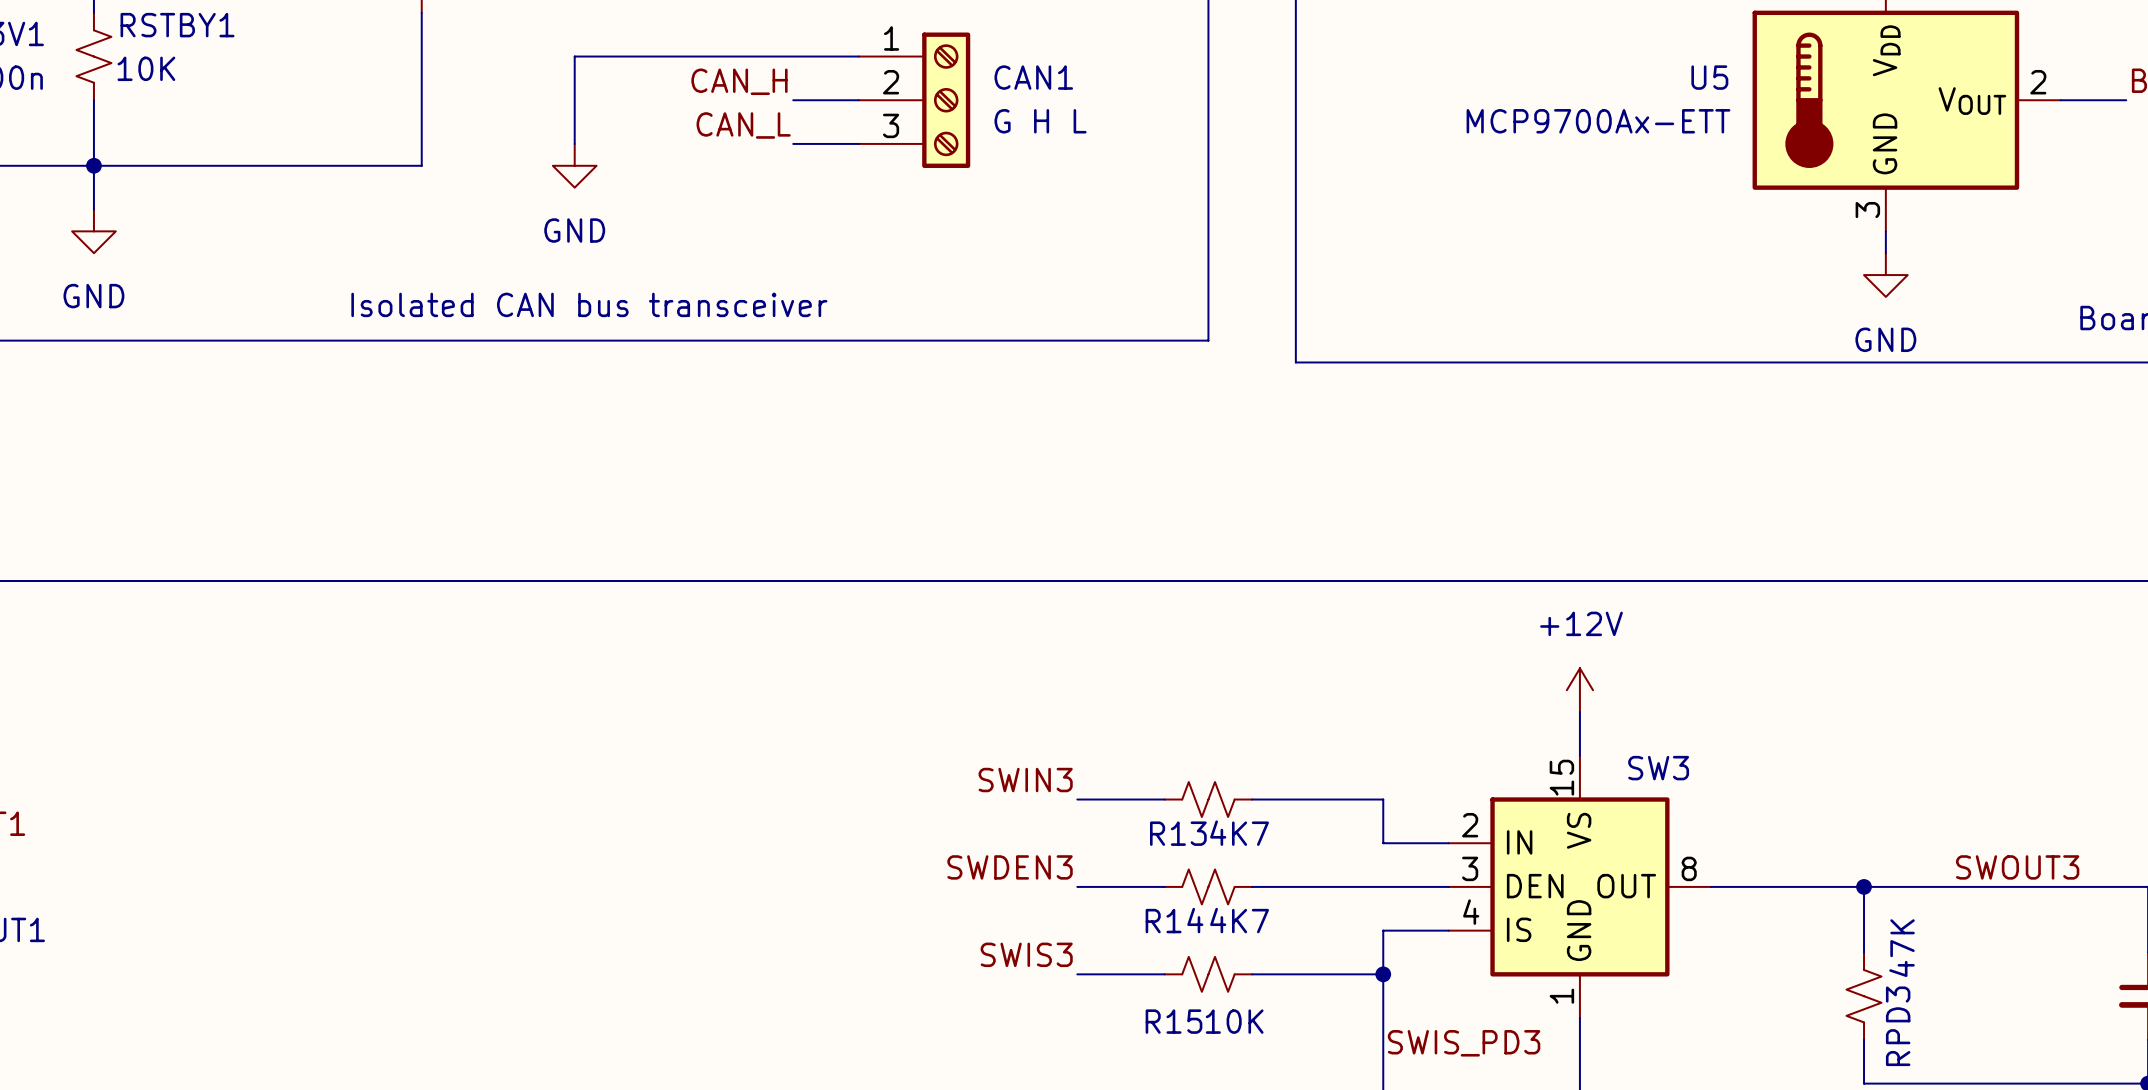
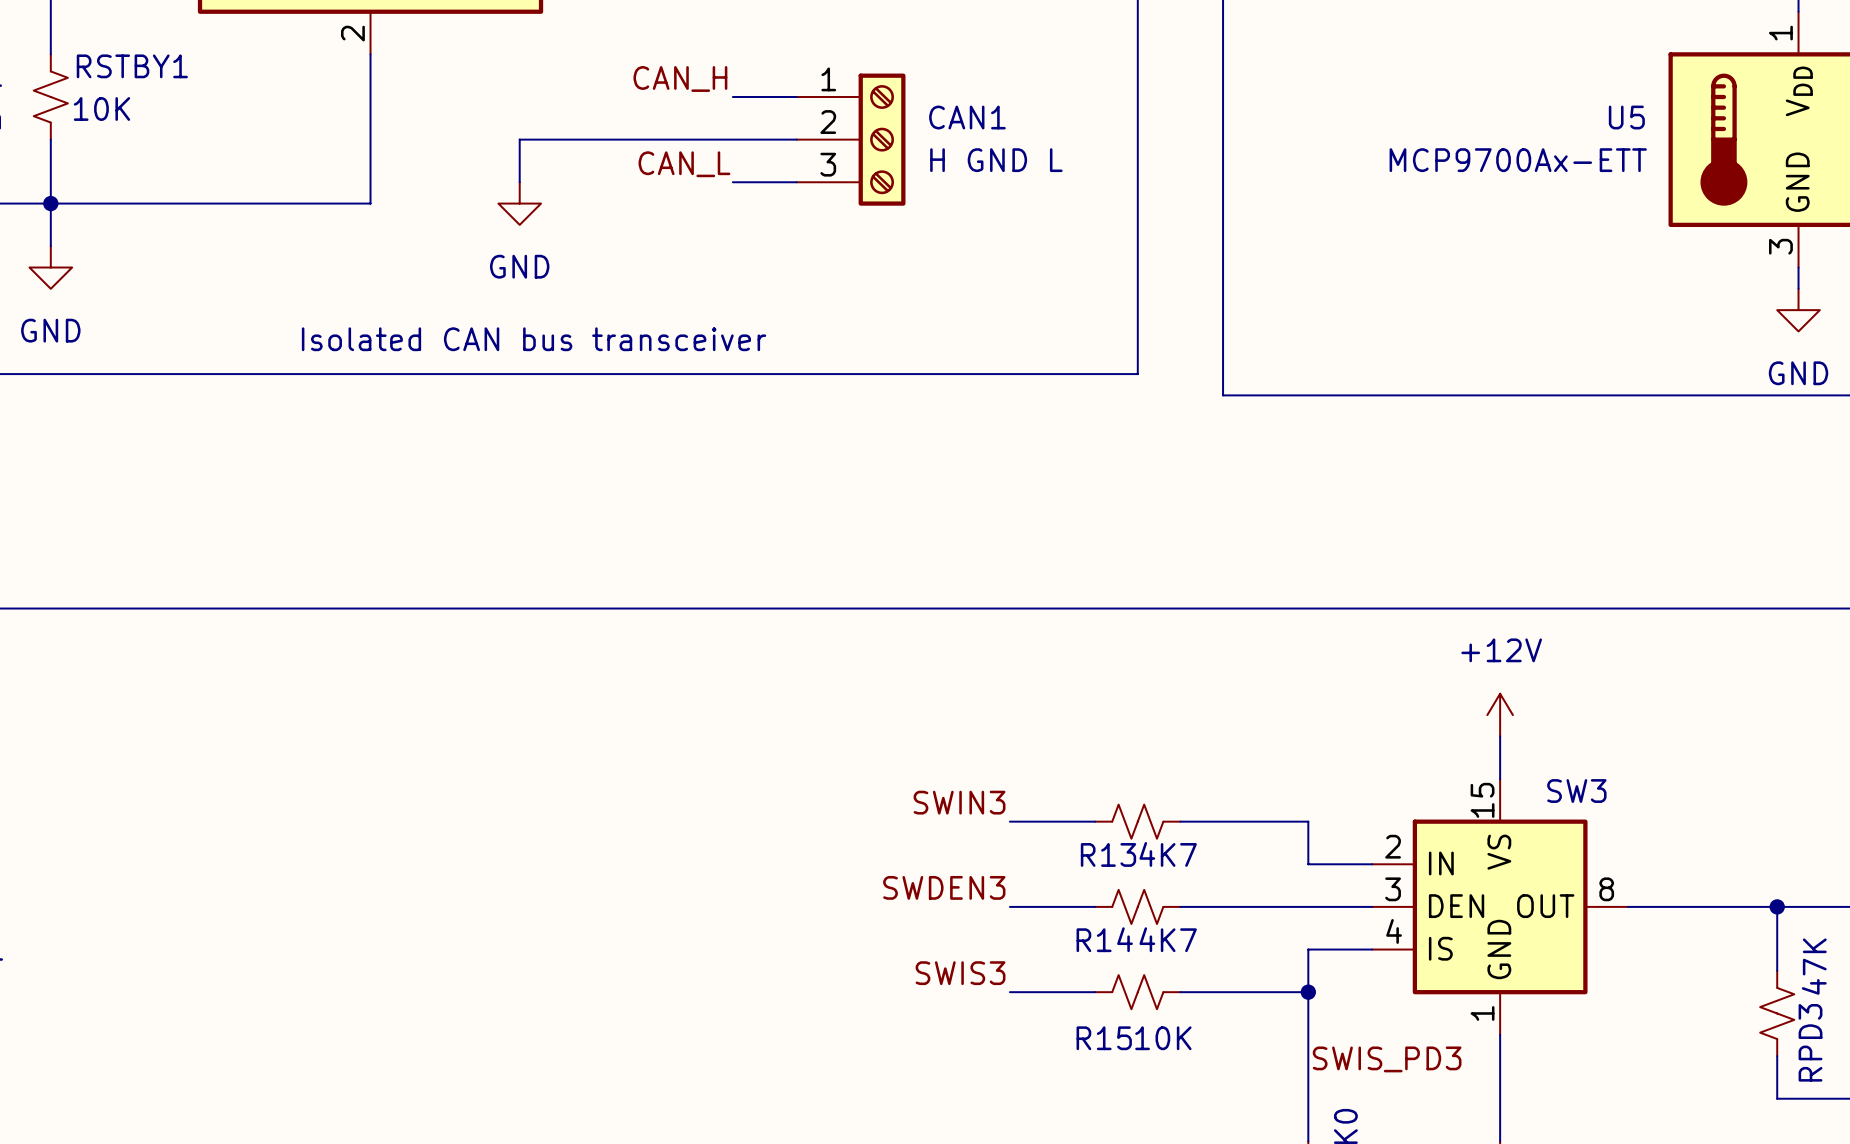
wire: (793, 56) (574, 56) (574, 100) -> (732, 139) (519, 139)
label position: CAN_H (739, 81) -> CAN_H (680, 78)
CAN1 value: G H L (1040, 121) -> H GND L (996, 160)

